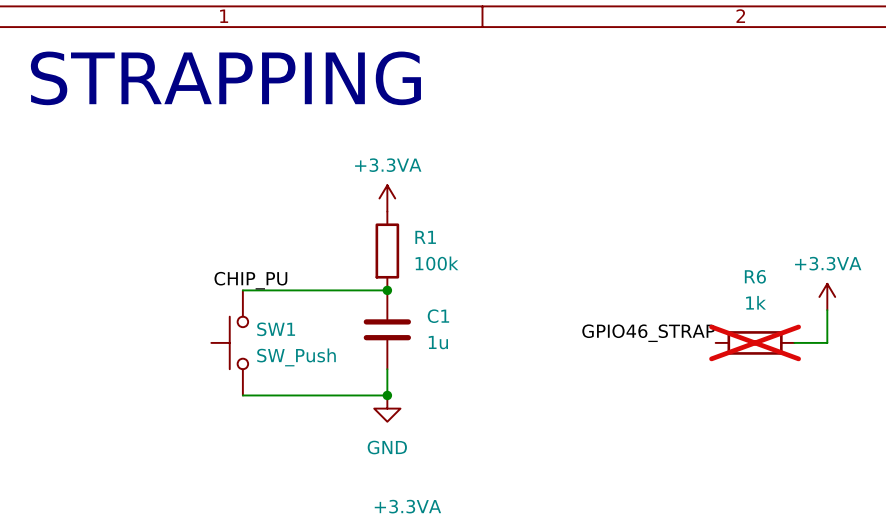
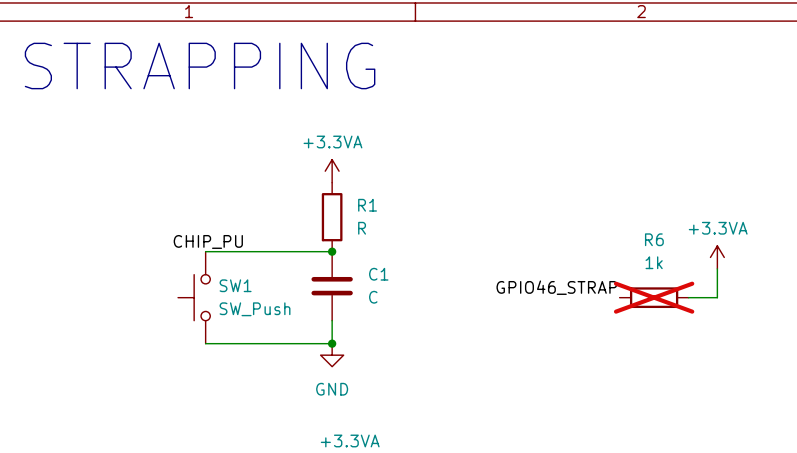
R1 value: 100k (436, 263) -> R (362, 228)
C1 value: 1u (438, 342) -> C (373, 297)

